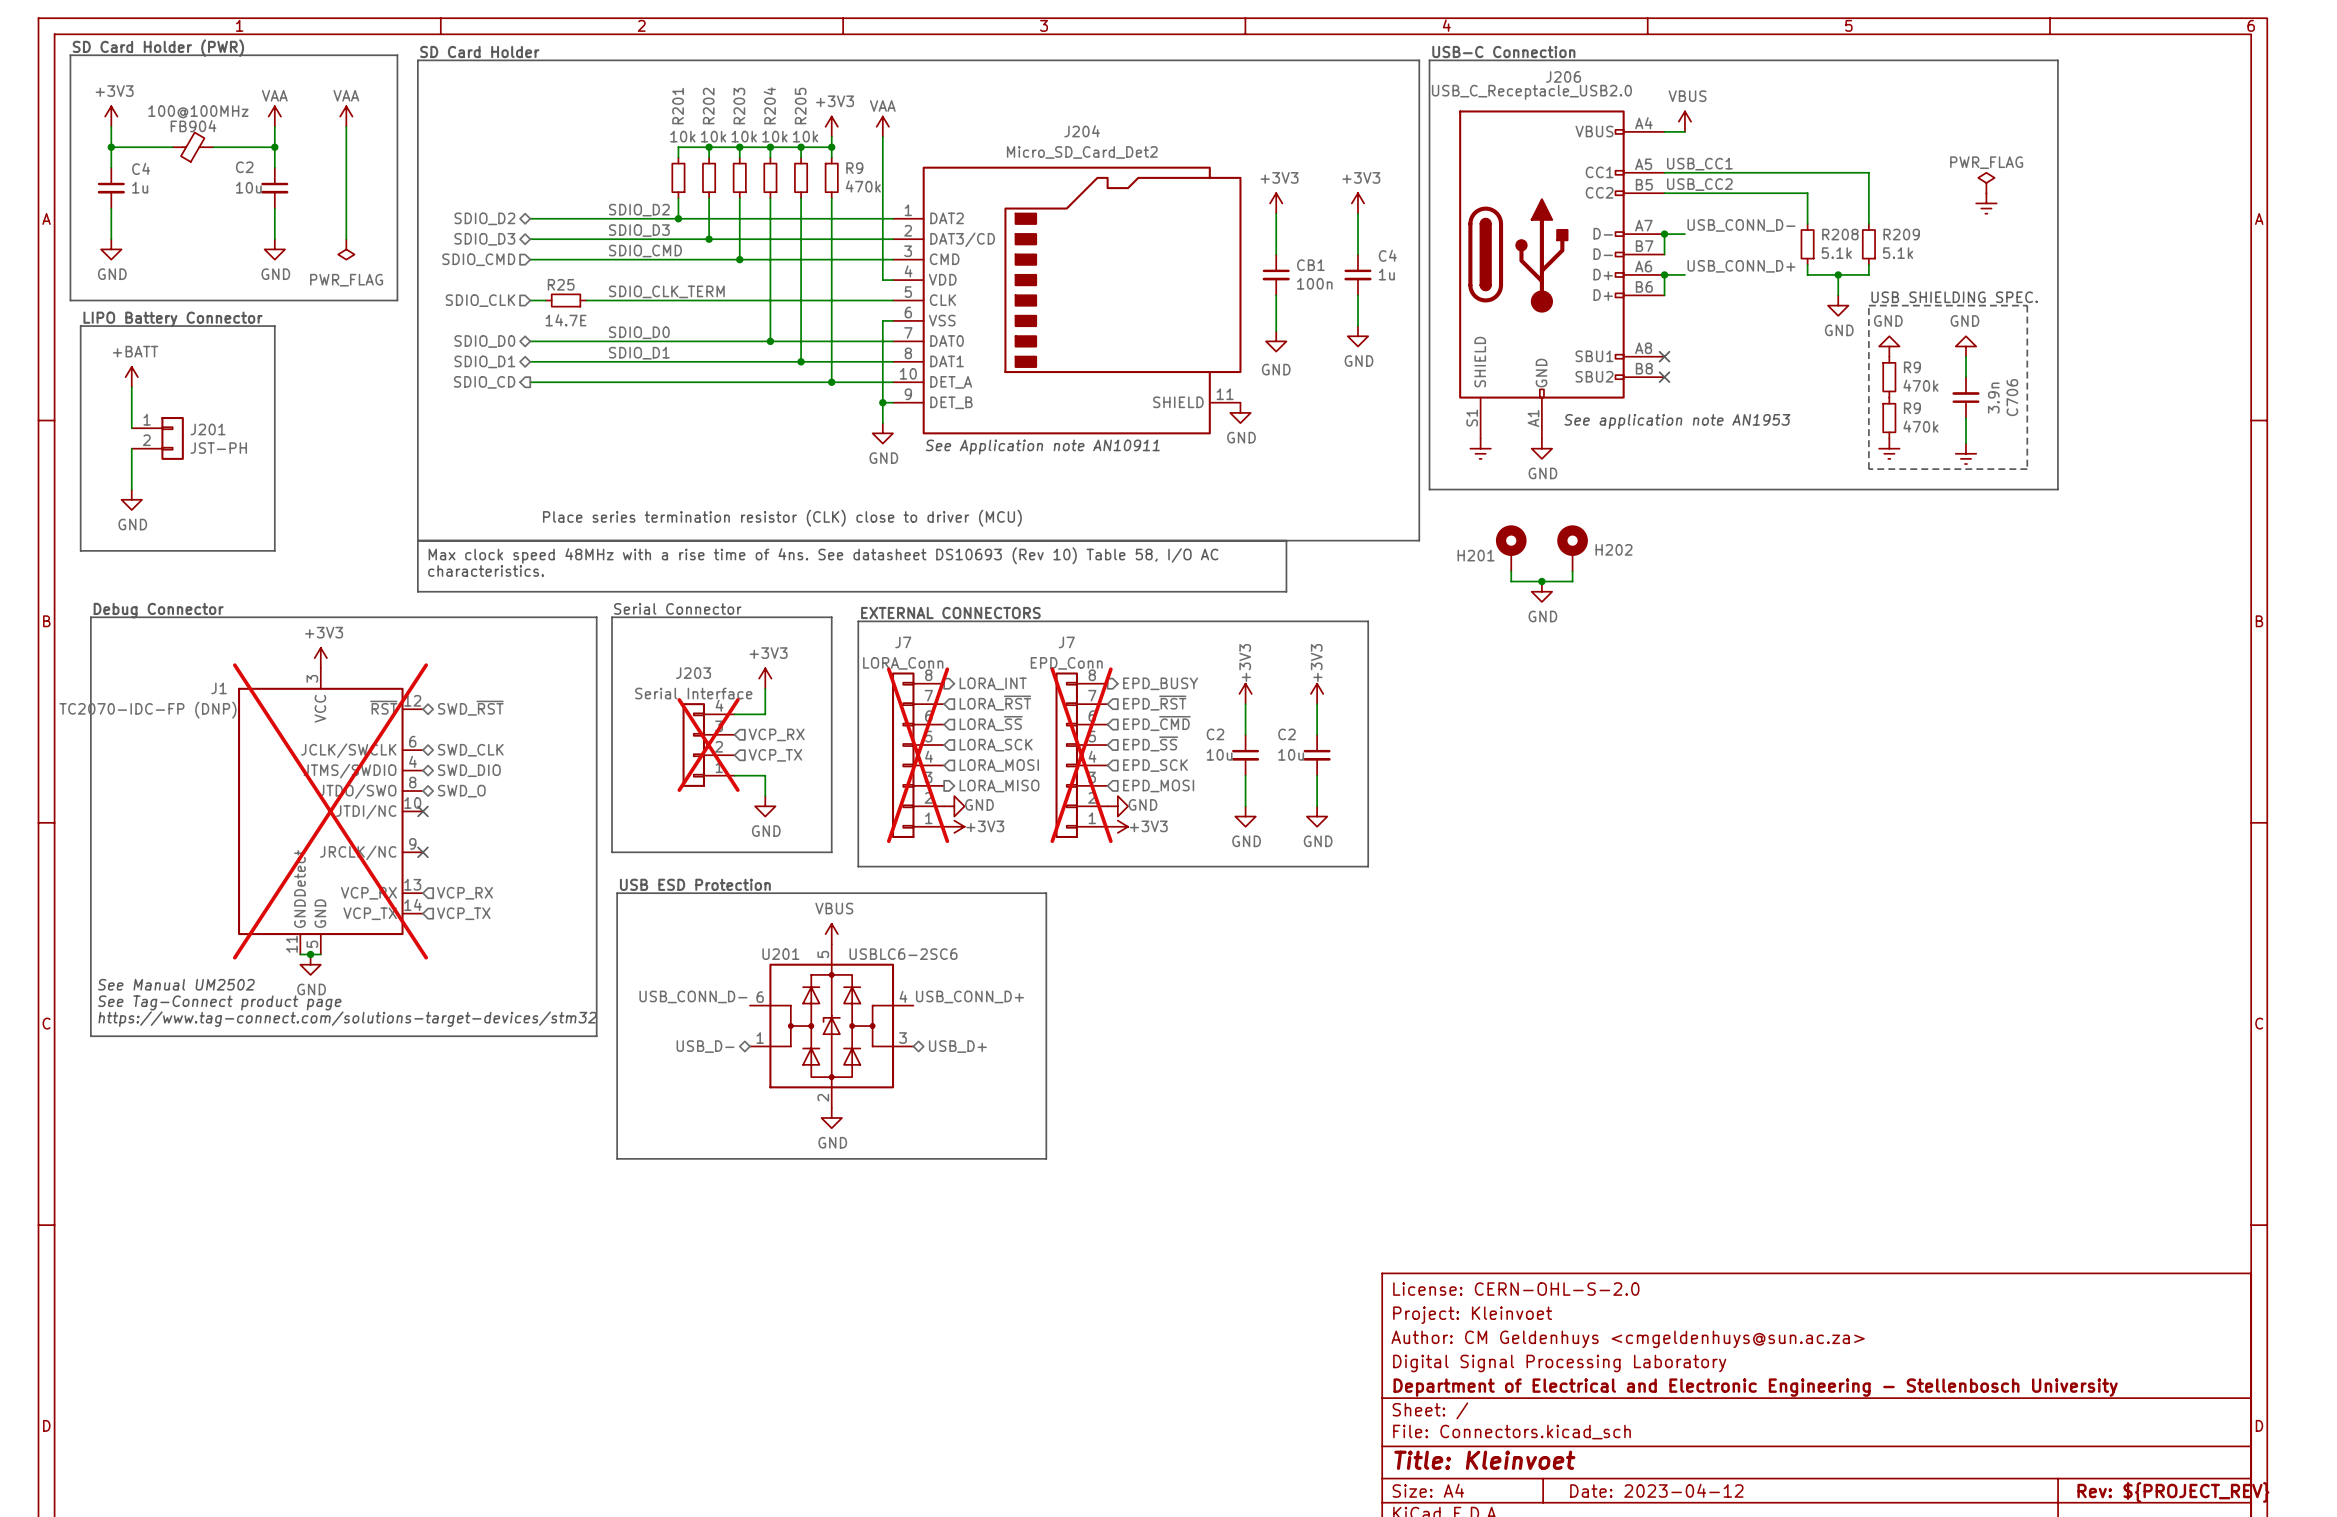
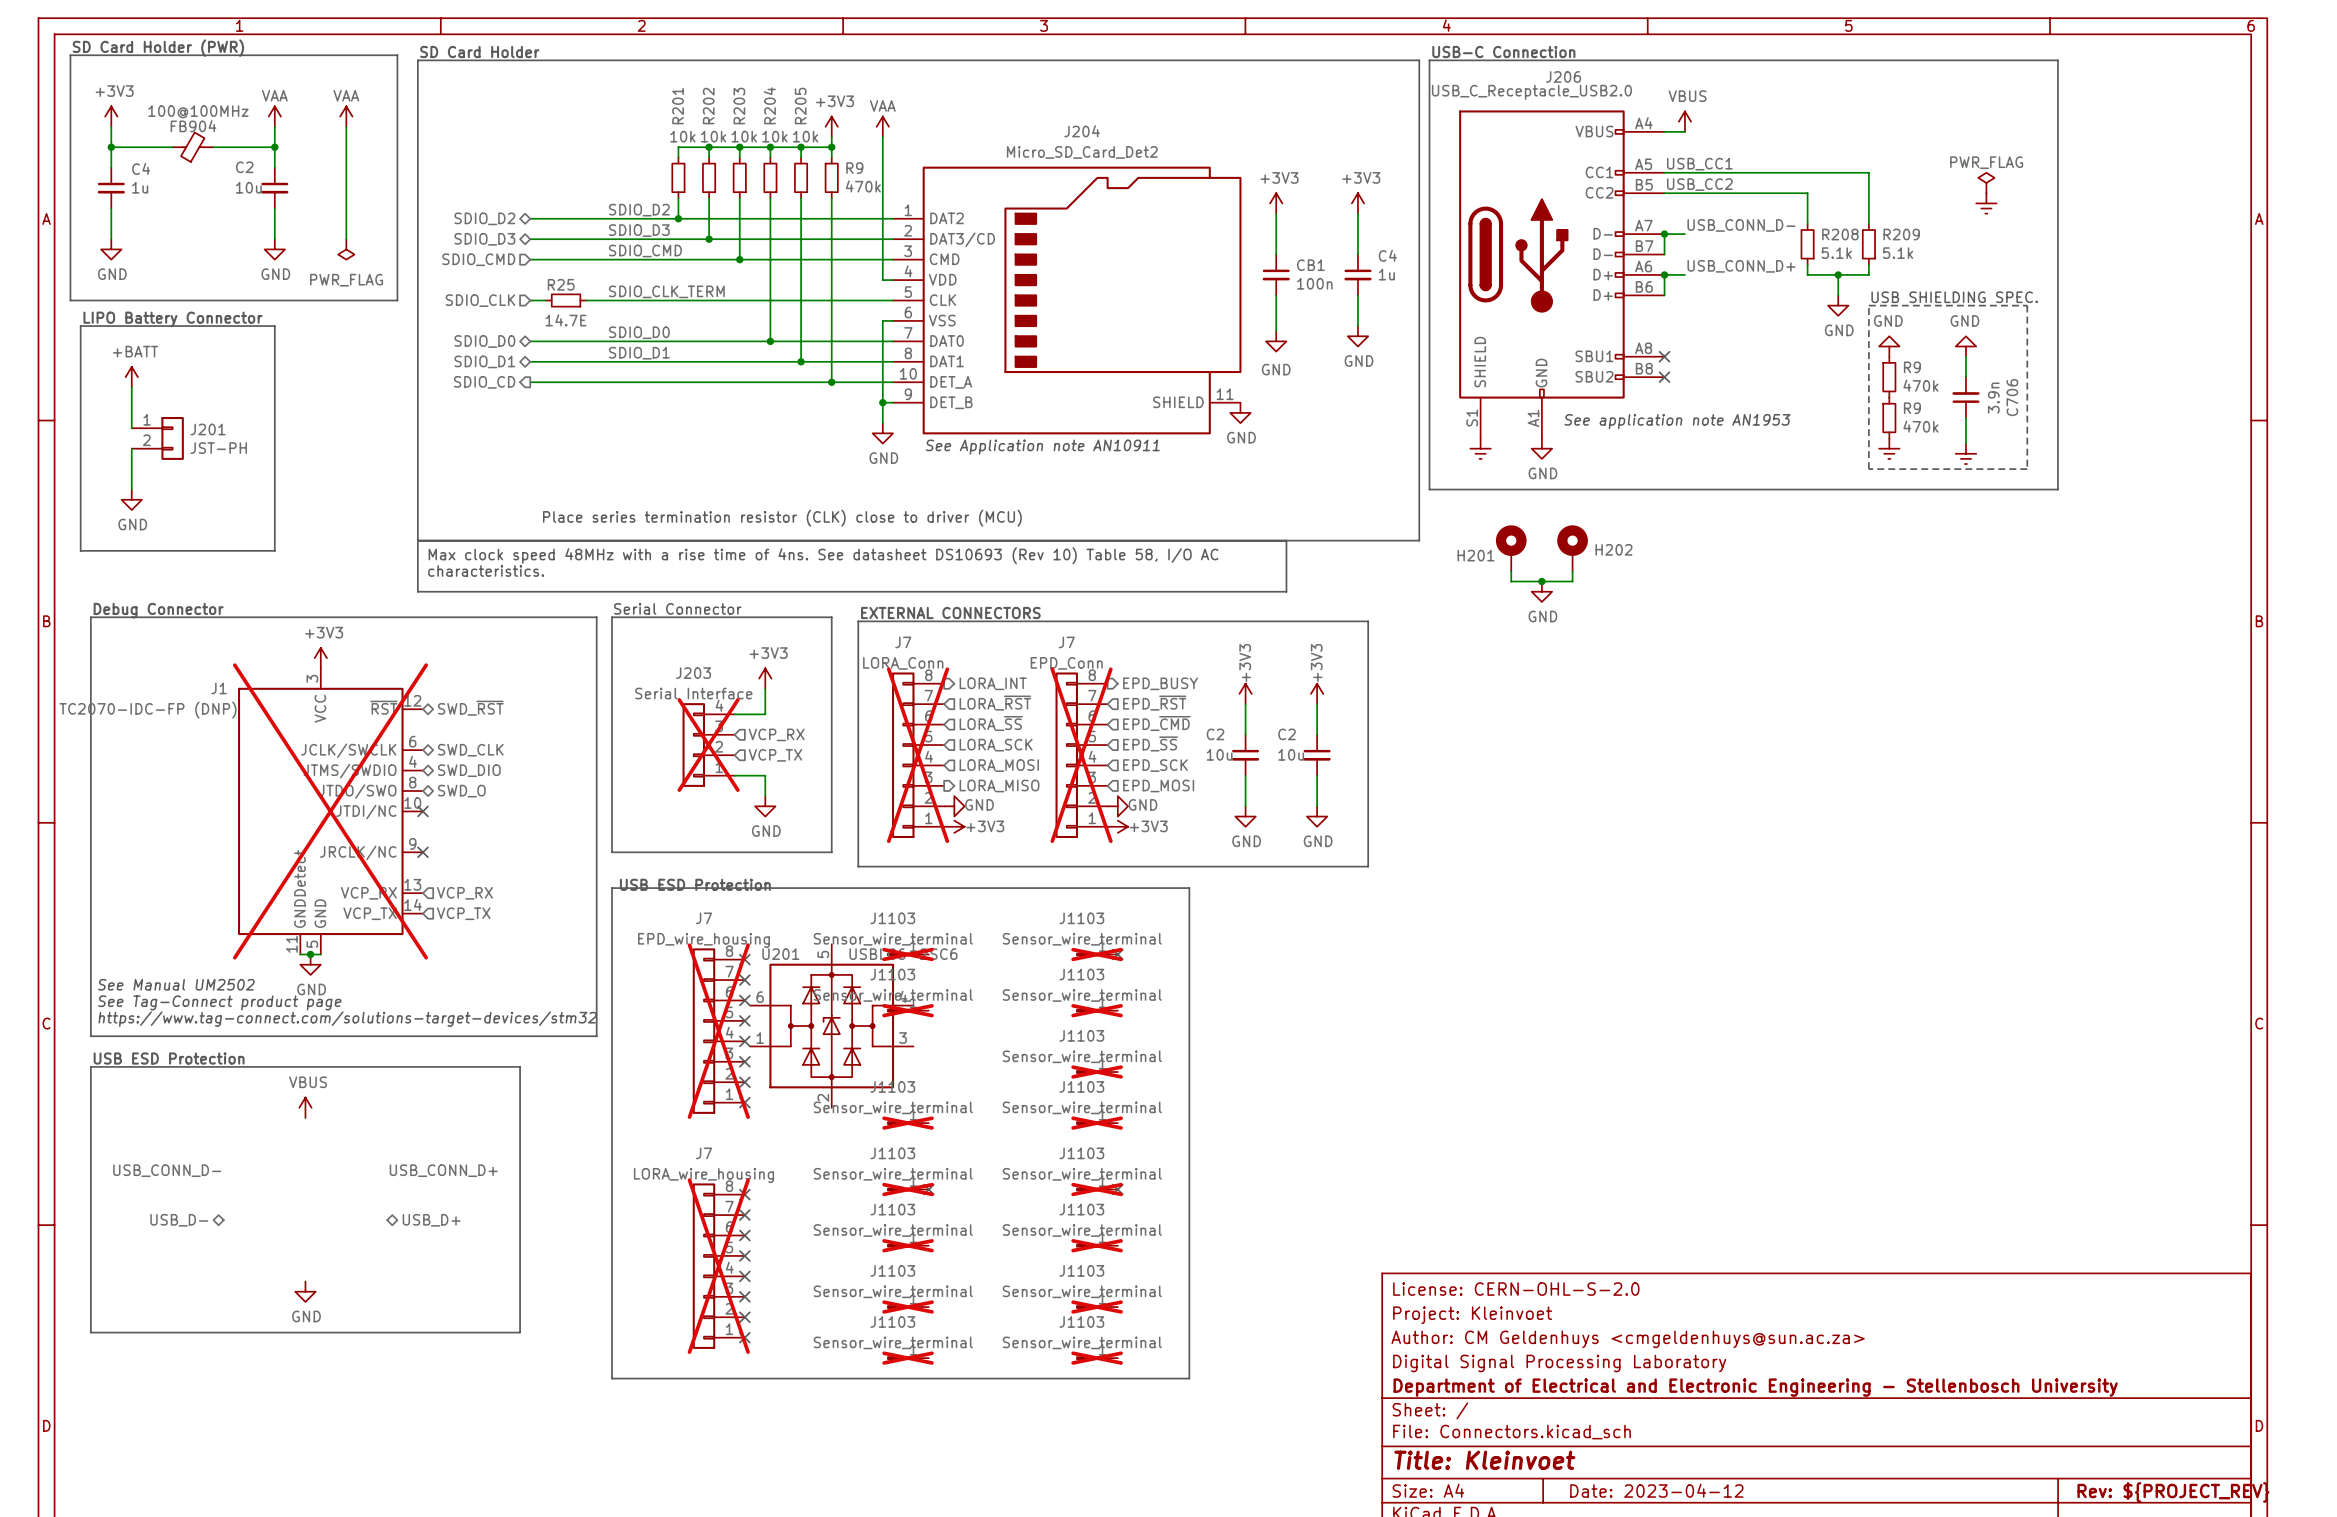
line: none -> (612, 888) (1189, 888) (1189, 1378) (612, 1378) (612, 888)
line: (617, 893) (1046, 893) (1046, 1158) (617, 1158) (617, 893) -> none
power symbol: VBUS (831, 934) -> none
J1103: none -> Sensor_wire_terminal (908, 954)
J1103: none -> Sensor_wire_terminal (1097, 954)
no-connect mark: none -> (1117, 954)
no-connect mark: none -> (744, 959)
no-connect mark: none -> (744, 980)
label: USB_CONN_D- (693, 996) -> none
label: USB_CONN_D+ (969, 996) -> none
no-connect mark: none -> (744, 1000)
J1103: none -> Sensor_wire_terminal (908, 1010)
J1103: none -> Sensor_wire_terminal (1097, 1010)
no-connect mark: none -> (744, 1020)
J7: none -> EPD_wire_housing (718, 1031)
no-connect mark: none -> (744, 1041)
hierarchical label: USB_D- (705, 1046) -> none
hierarchical label: USB_D+ (957, 1046) -> none
text: none -> USB ESD Protection (169, 1058)
no-connect mark: none -> (744, 1061)
line: none -> (90, 1066) (520, 1066) (520, 1332) (90, 1332) (90, 1066)
J1103: none -> Sensor_wire_terminal (1097, 1072)
no-connect mark: none -> (744, 1082)
no-connect mark: none -> (744, 1102)
power symbol: none -> VBUS (305, 1107)
power symbol: GND (831, 1117) -> none
J1103: none -> Sensor_wire_terminal (908, 1123)
J1103: none -> Sensor_wire_terminal (1097, 1123)
label: none -> USB_CONN_D- (167, 1170)
label: none -> USB_CONN_D+ (443, 1170)
J1103: none -> Sensor_wire_terminal (908, 1189)
no-connect mark: none -> (928, 1189)
J1103: none -> Sensor_wire_terminal (1097, 1189)
no-connect mark: none -> (1117, 1189)
no-connect mark: none -> (744, 1194)
no-connect mark: none -> (744, 1215)
hierarchical label: none -> USB_D- (179, 1220)
hierarchical label: none -> USB_D+ (431, 1220)
no-connect mark: none -> (744, 1235)
J1103: none -> Sensor_wire_terminal (908, 1245)
J1103: none -> Sensor_wire_terminal (1097, 1245)
no-connect mark: none -> (744, 1255)
J7: none -> LORA_wire_housing (718, 1266)
no-connect mark: none -> (744, 1276)
power symbol: none -> GND (305, 1291)
no-connect mark: none -> (744, 1296)
J1103: none -> Sensor_wire_terminal (908, 1307)
J1103: none -> Sensor_wire_terminal (1097, 1307)
no-connect mark: none -> (744, 1317)
no-connect mark: none -> (744, 1337)
J1103: none -> Sensor_wire_terminal (908, 1358)
J1103: none -> Sensor_wire_terminal (1097, 1358)

